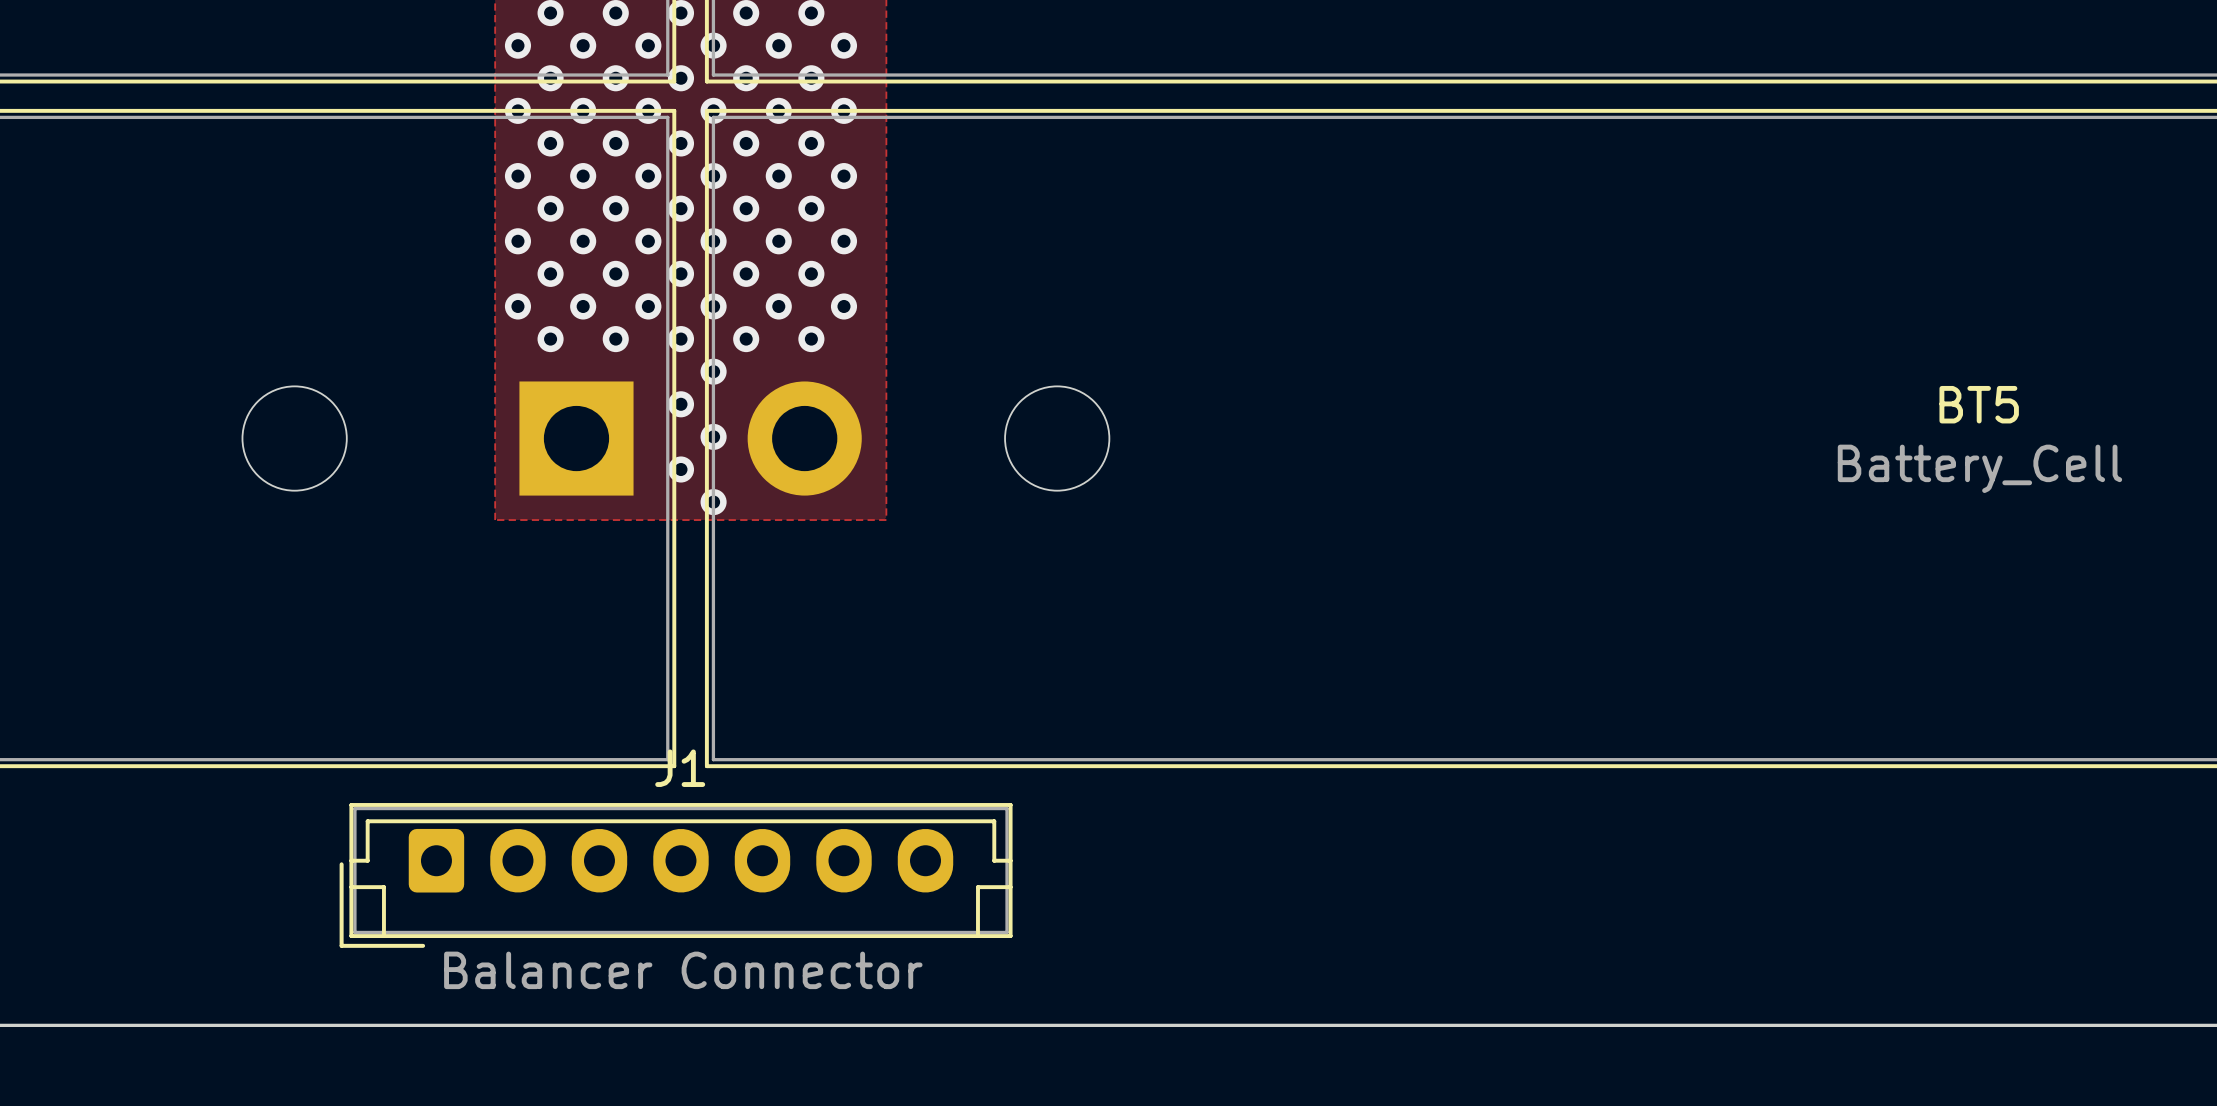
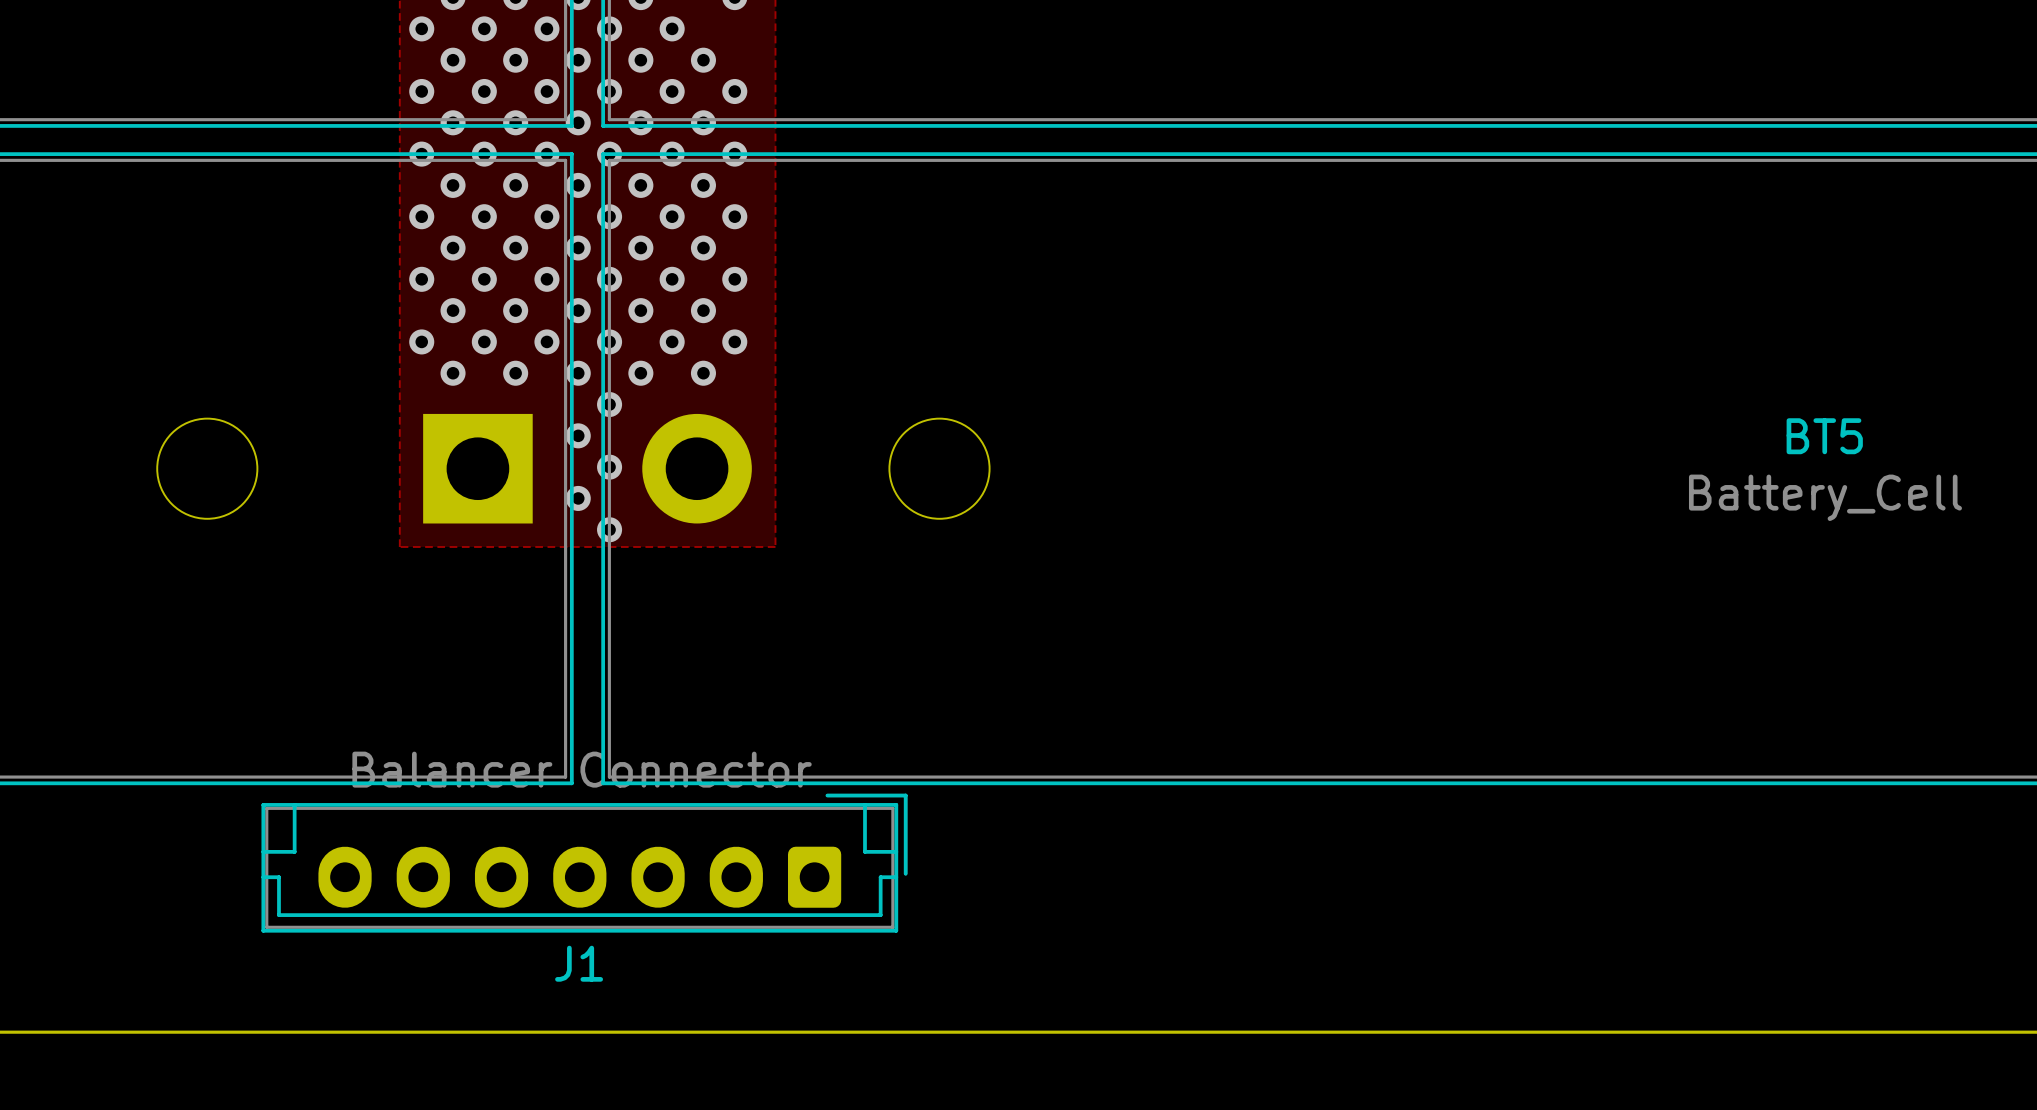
J1 rotation: 0° (676, 875) -> 180° (584, 863)

